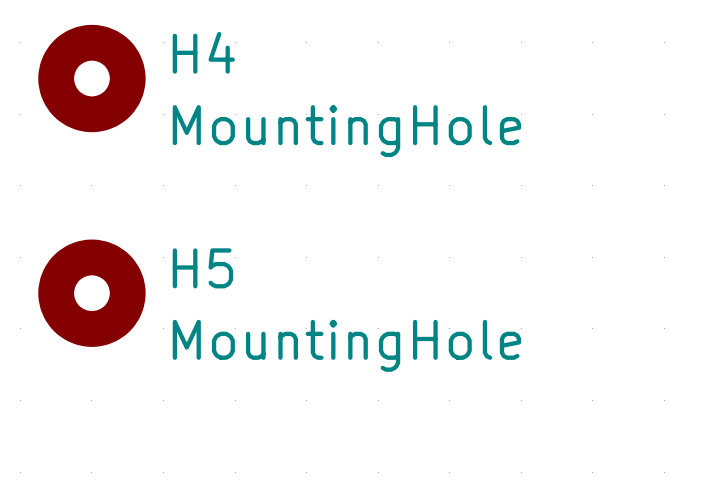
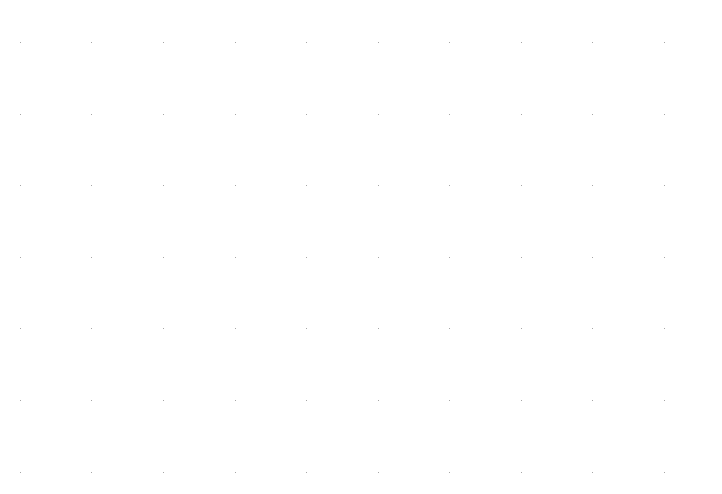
H4: MountingHole (91, 78) -> none
H5: MountingHole (91, 293) -> none

